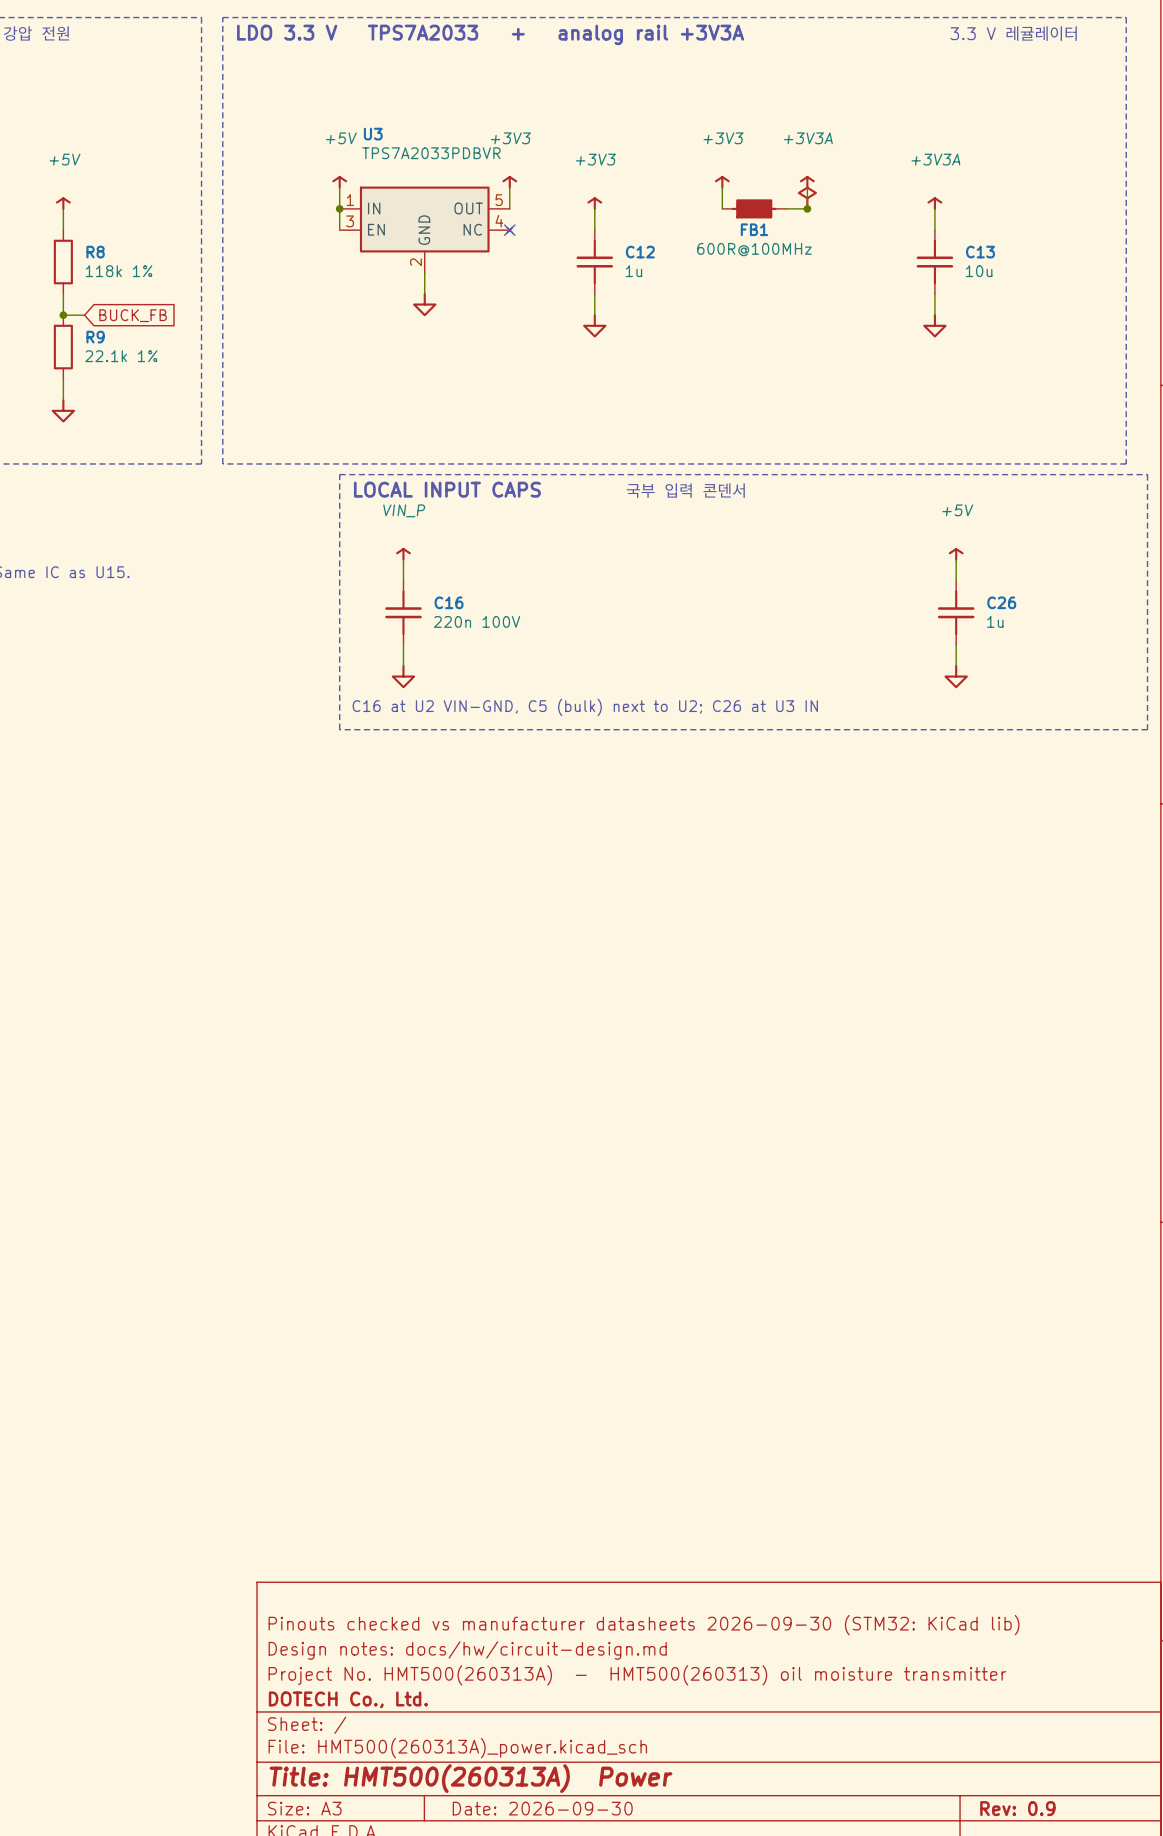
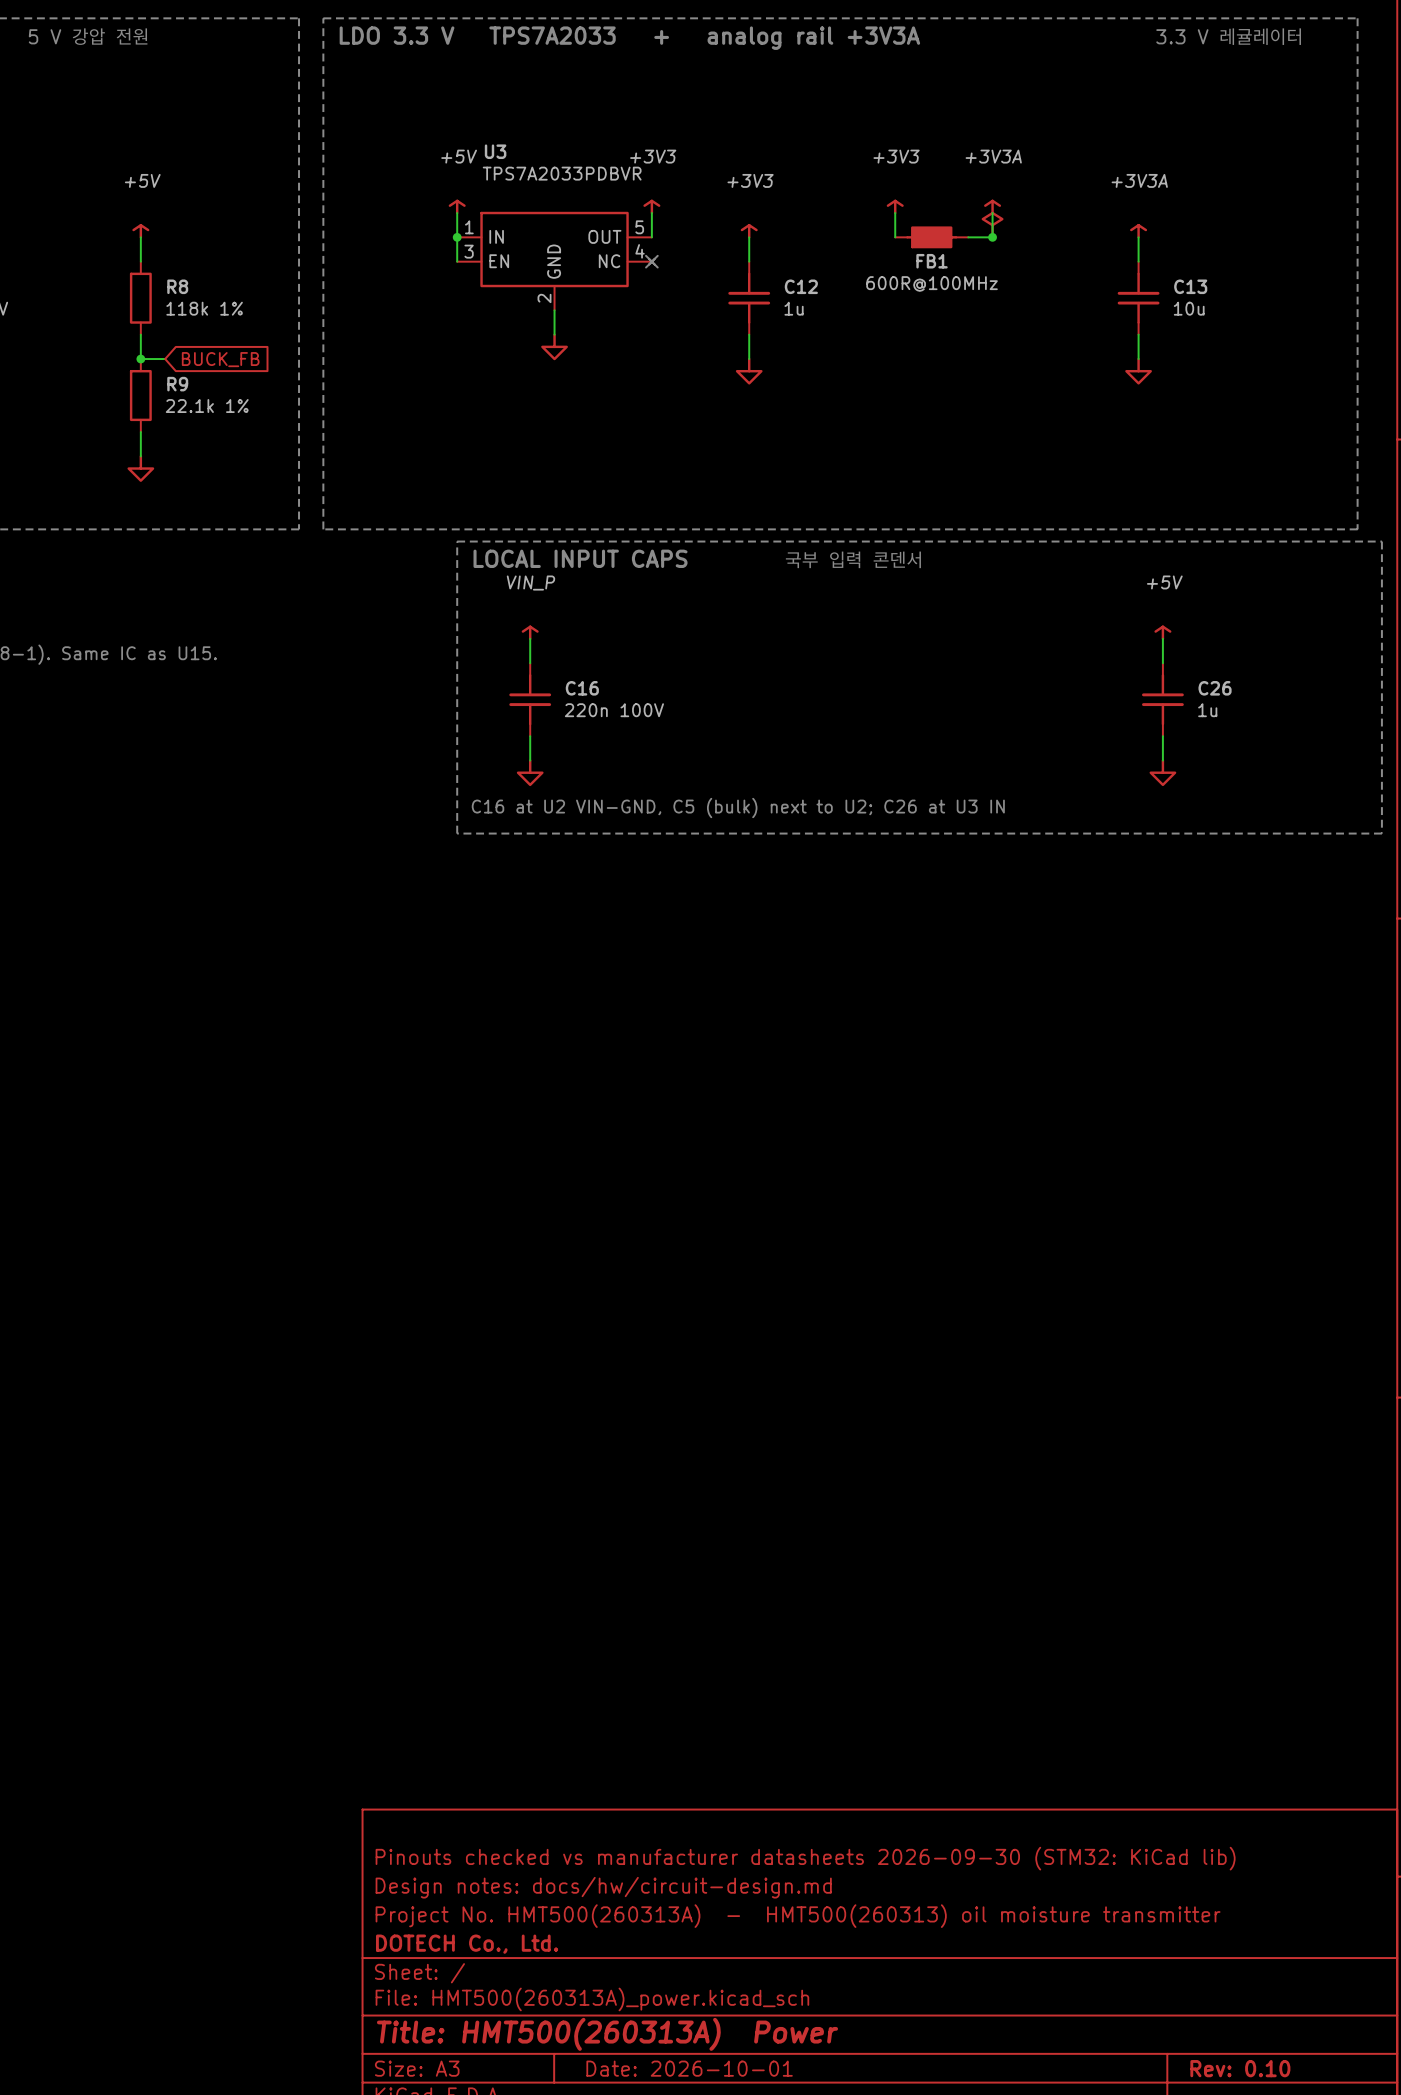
title block: Date: 2026-09-30 (542, 1808) -> Date: 2026-10-01 (689, 2068)
title block: Rev: 0.9 (1017, 1808) -> Rev: 0.10 (1240, 2068)

